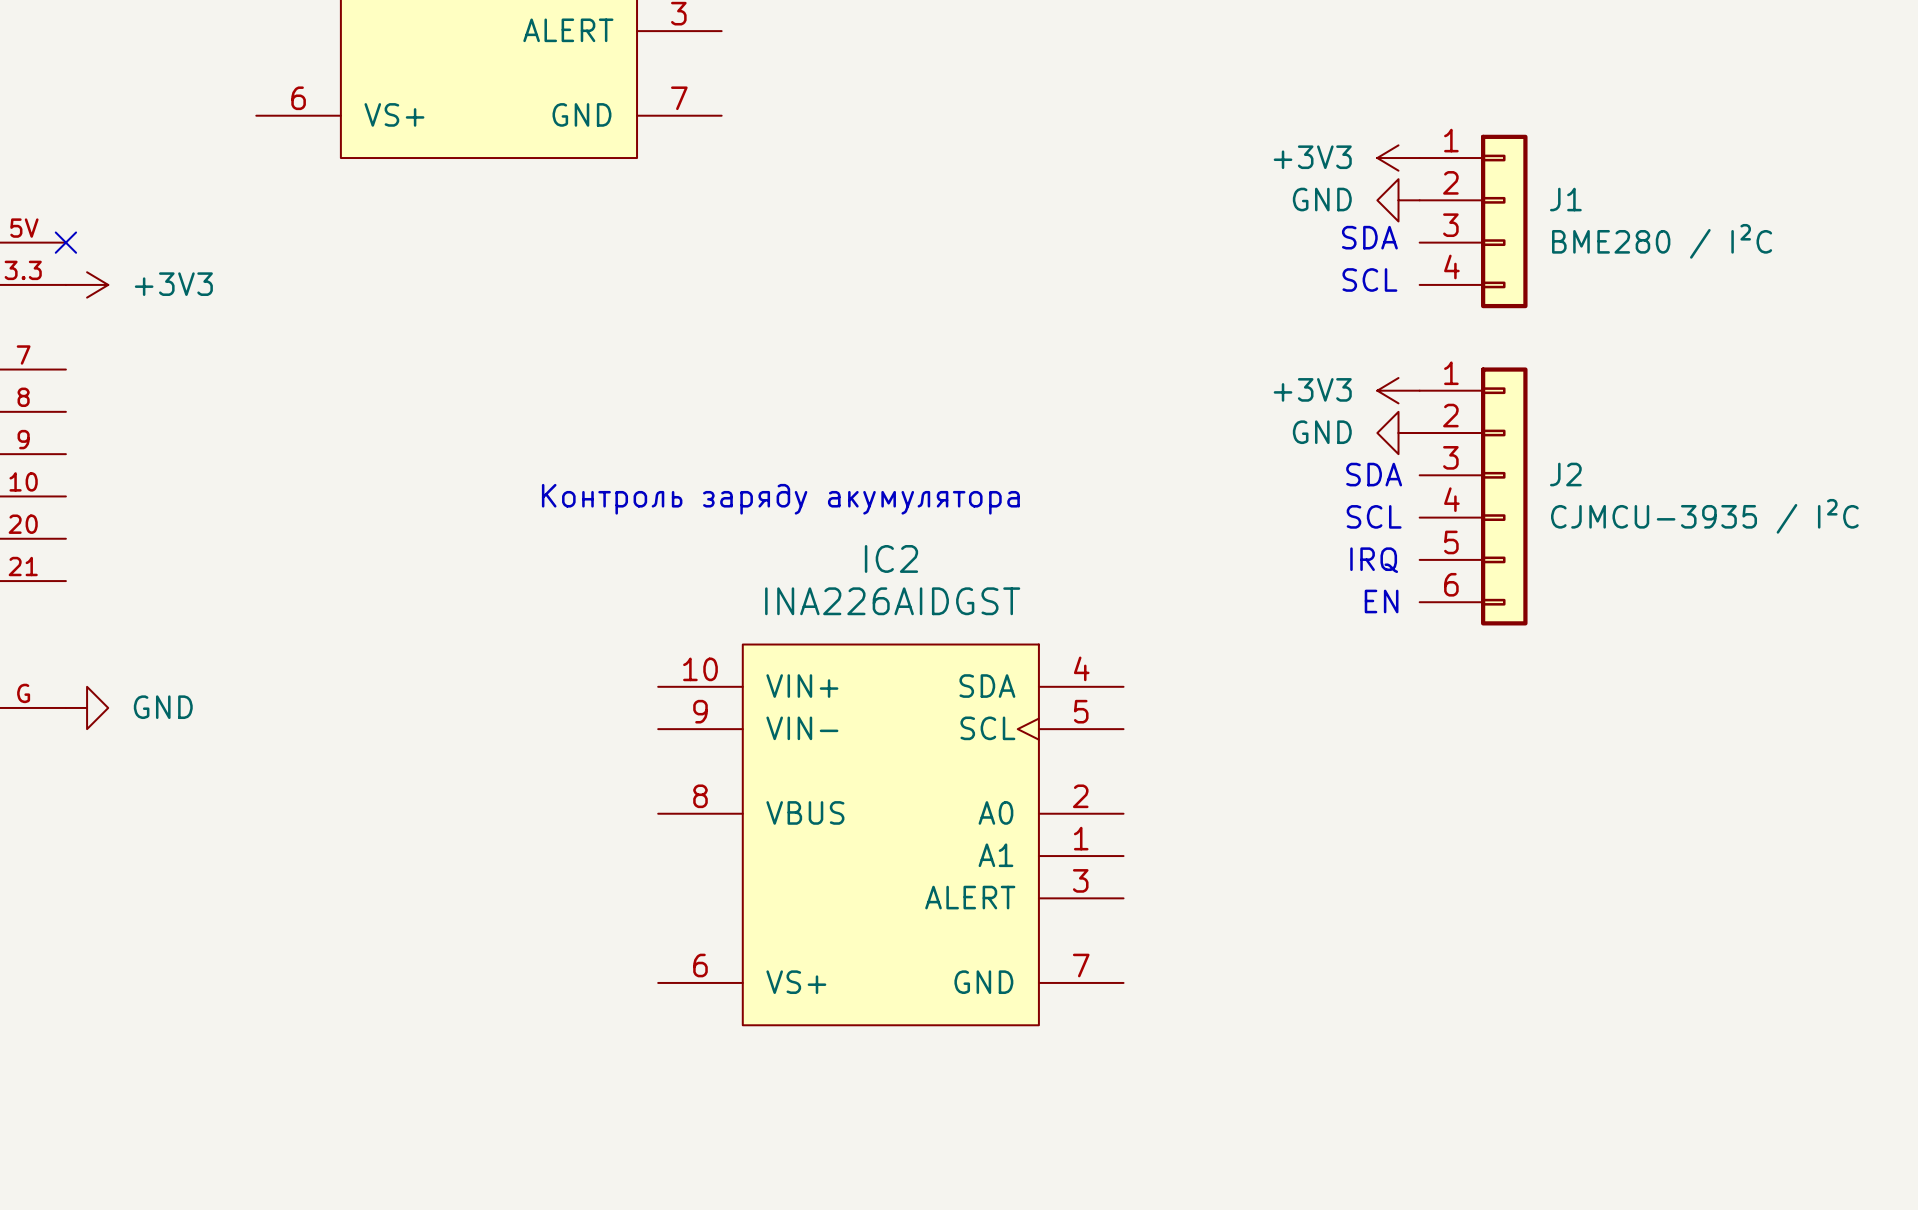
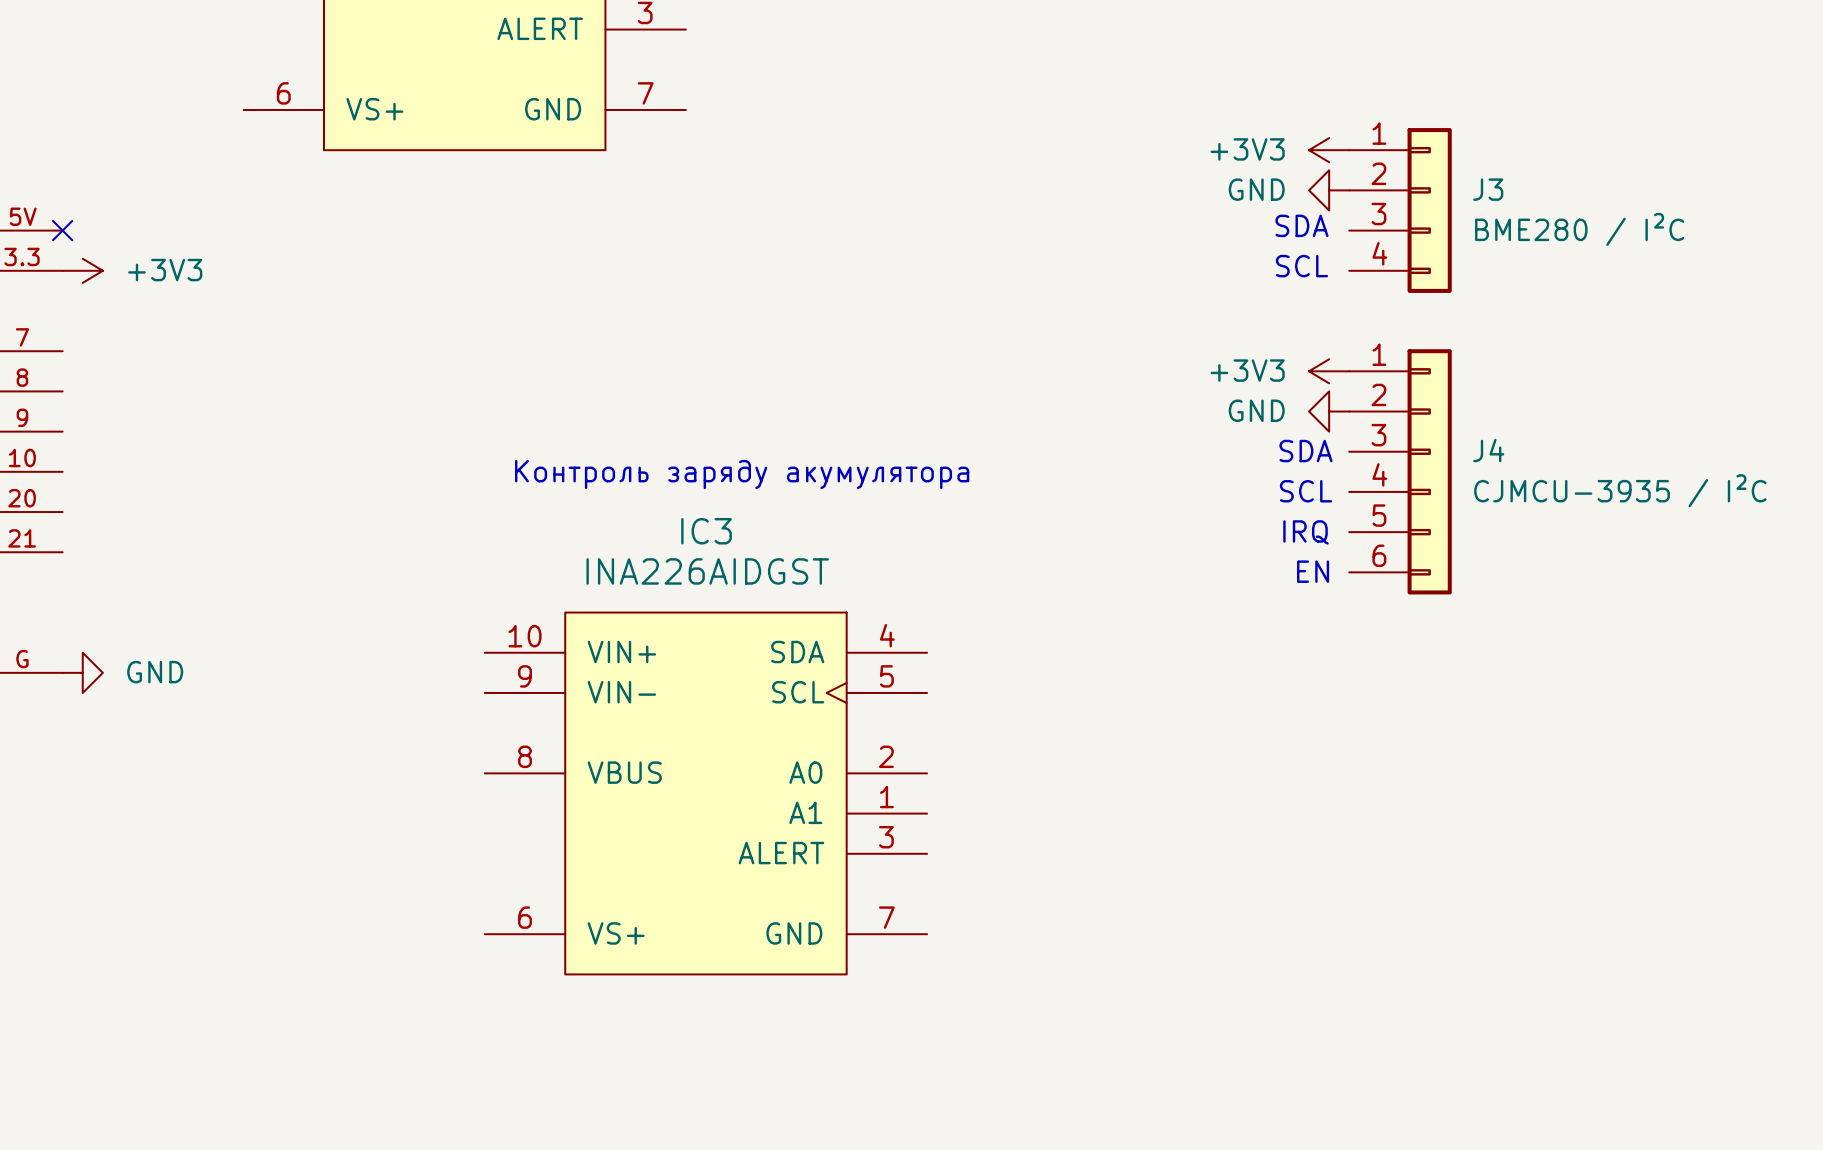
J1 name: J1 (1565, 199) -> J3 (1488, 189)
J2 name: J2 (1565, 474) -> J4 (1488, 450)
IC3: none -> INA226AIDGST (705, 793)
IC2: INA226AIDGST (890, 834) -> none

